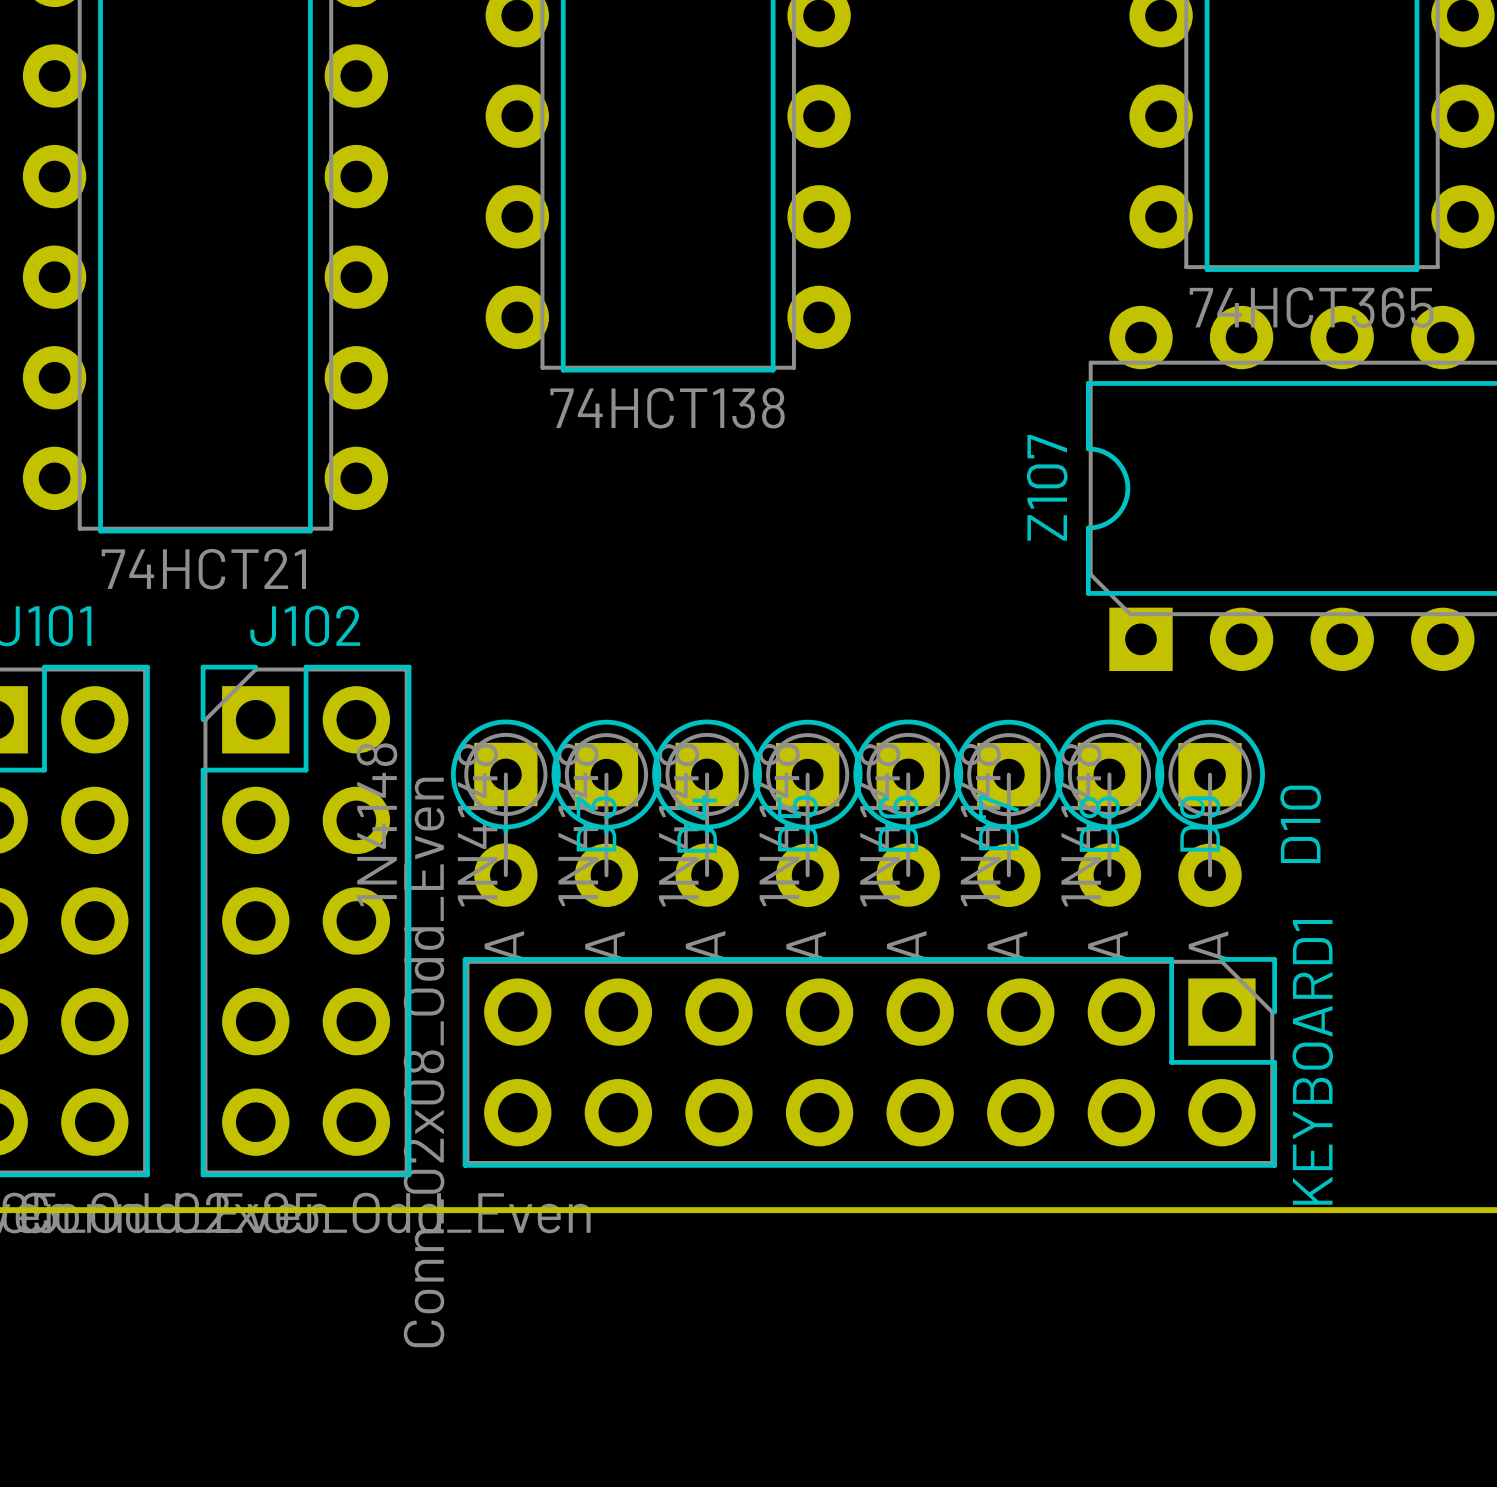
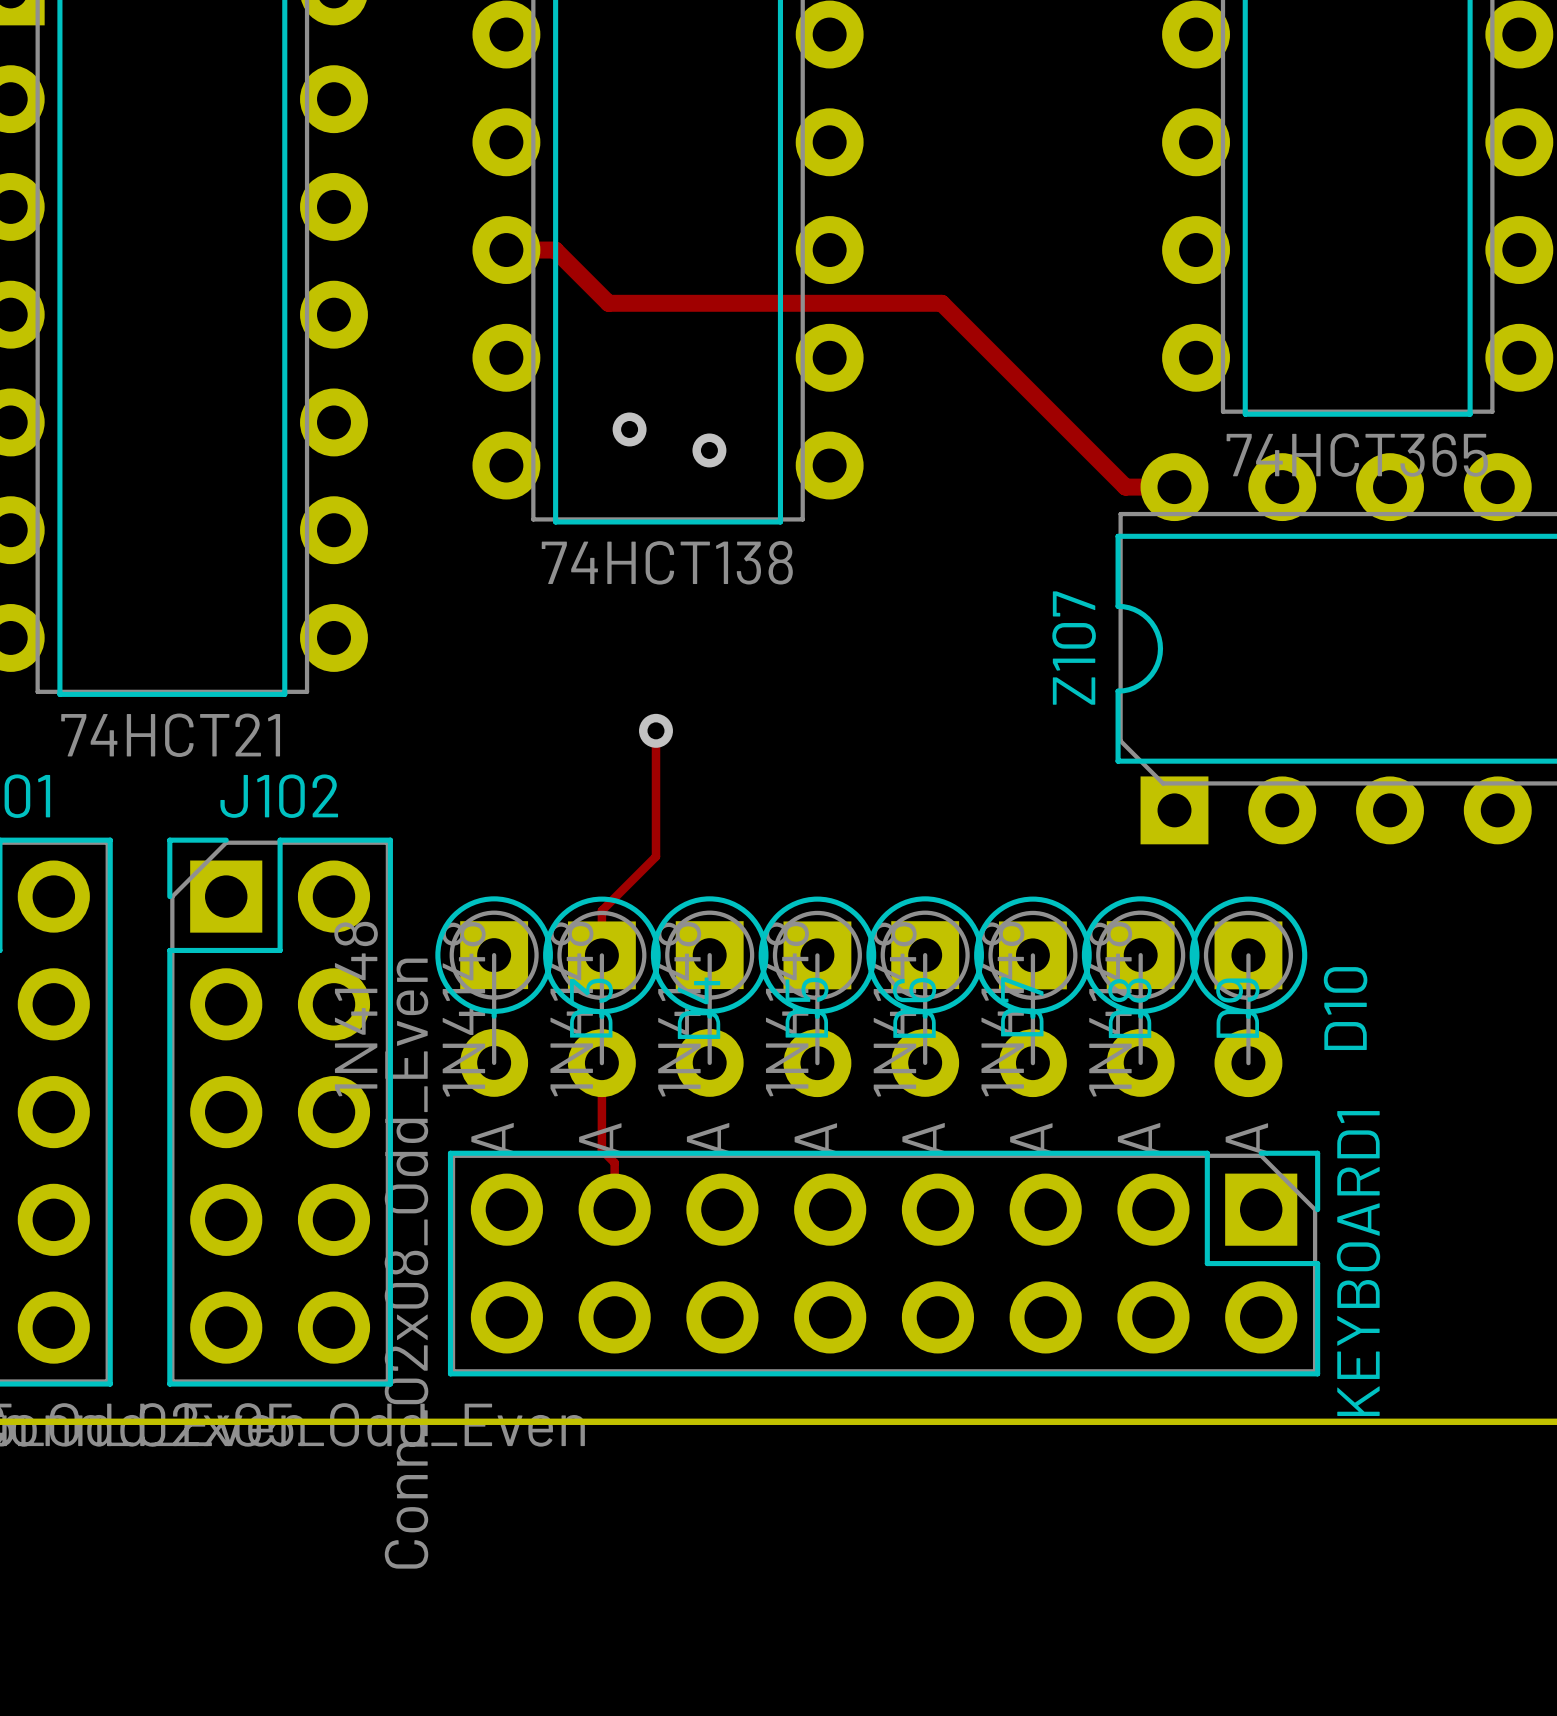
track: none -> (506, 250) (555, 250) (608, 303) (941, 303) (1125, 487) (1174, 487)
via: none -> (629, 429)
via: none -> (709, 450)
track: none -> (656, 730) (656, 856) (601, 910) (601, 955)
via: none -> (656, 730)
track: none -> (601, 1063) (601, 1150) (614, 1162) (614, 1209)

